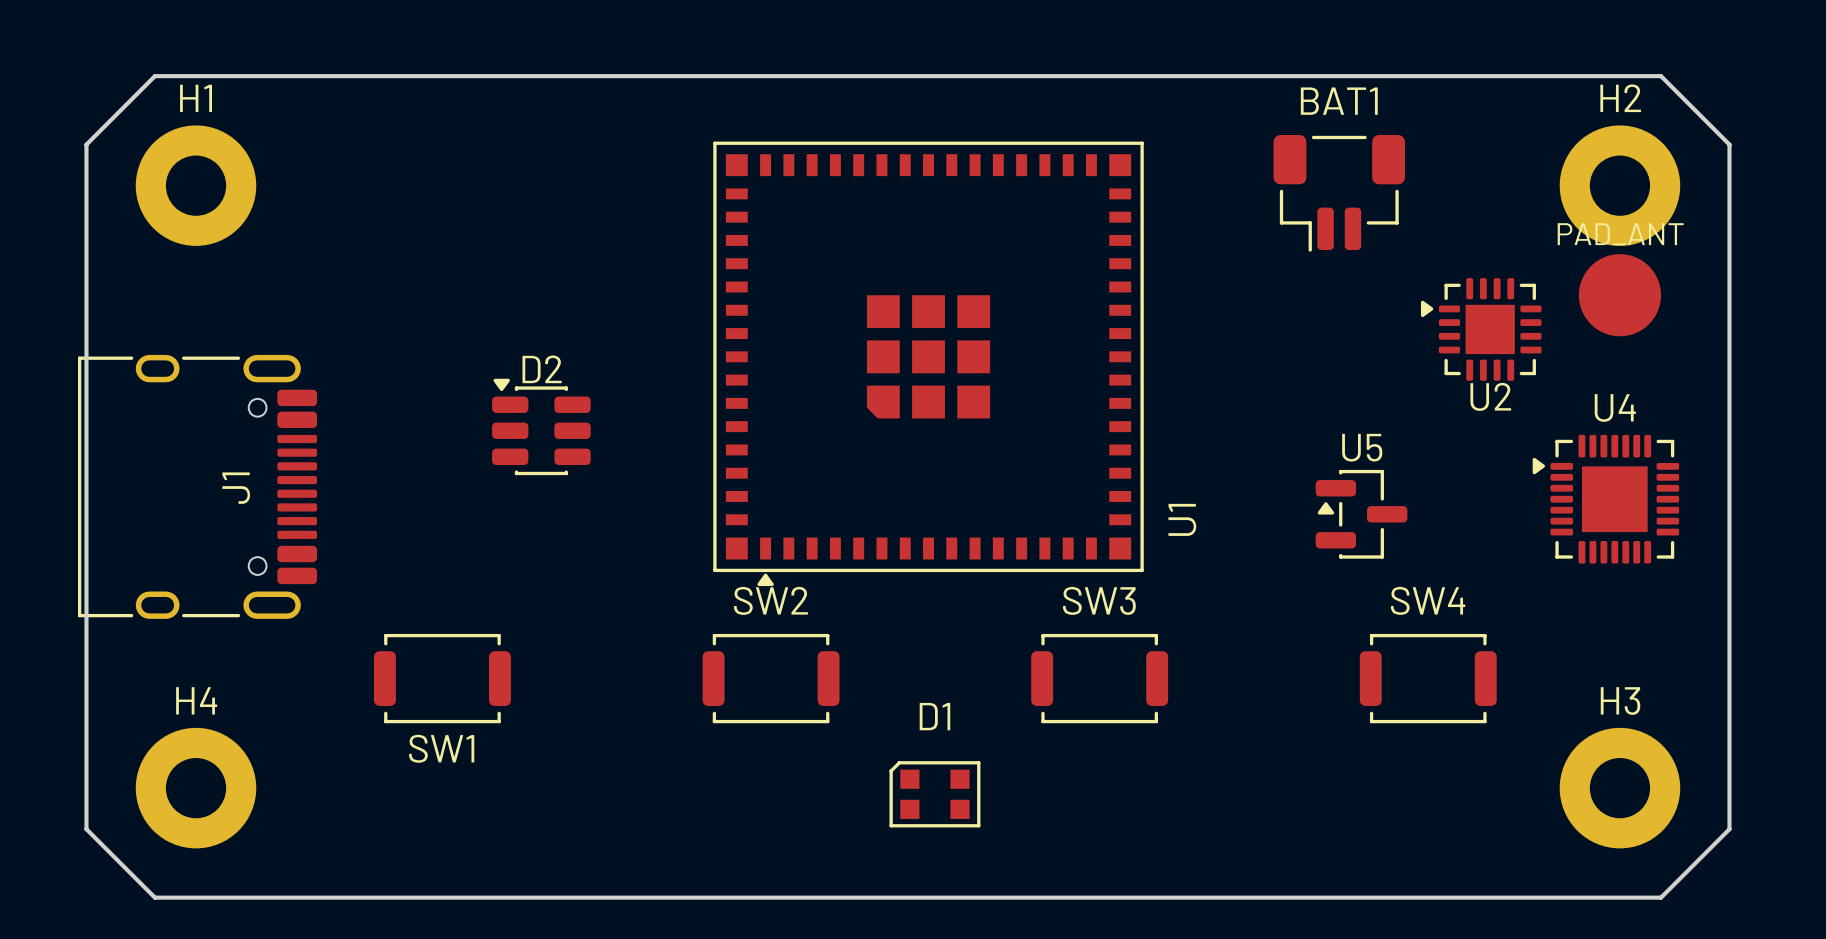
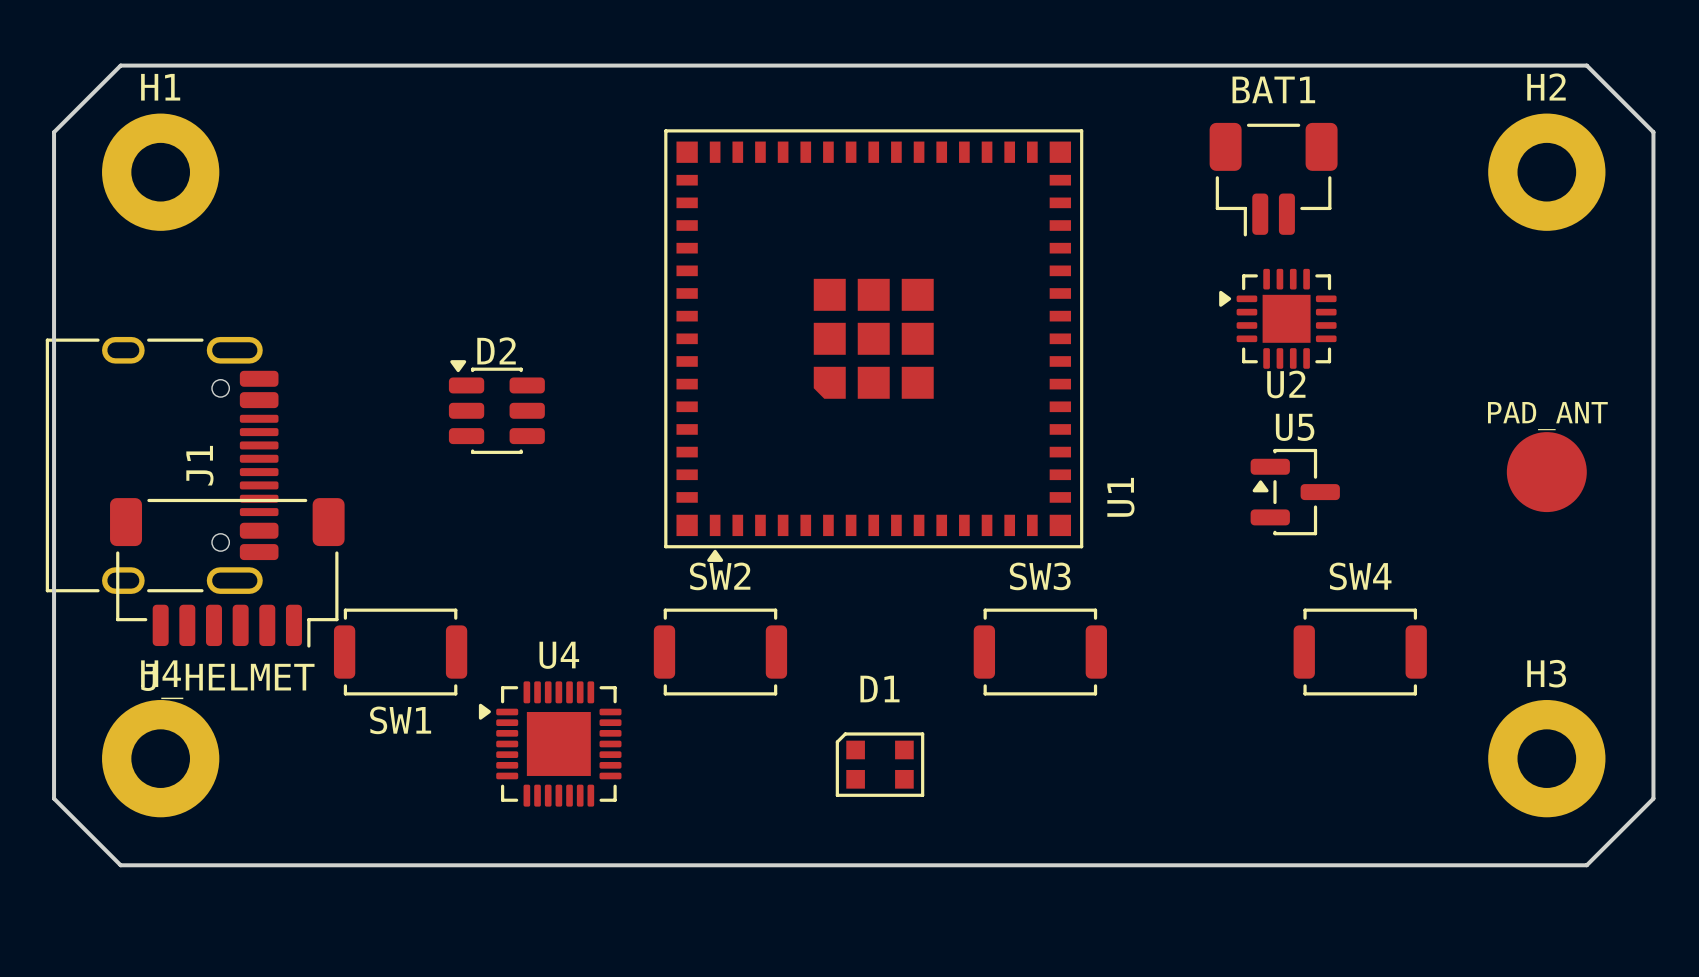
PAD_ANT position: (1619, 295) -> (1546, 472)
U2 position: (1481, 329) -> (1277, 318)
U4 position: (1605, 499) -> (550, 743)
J_HELMET: none -> (227, 572)

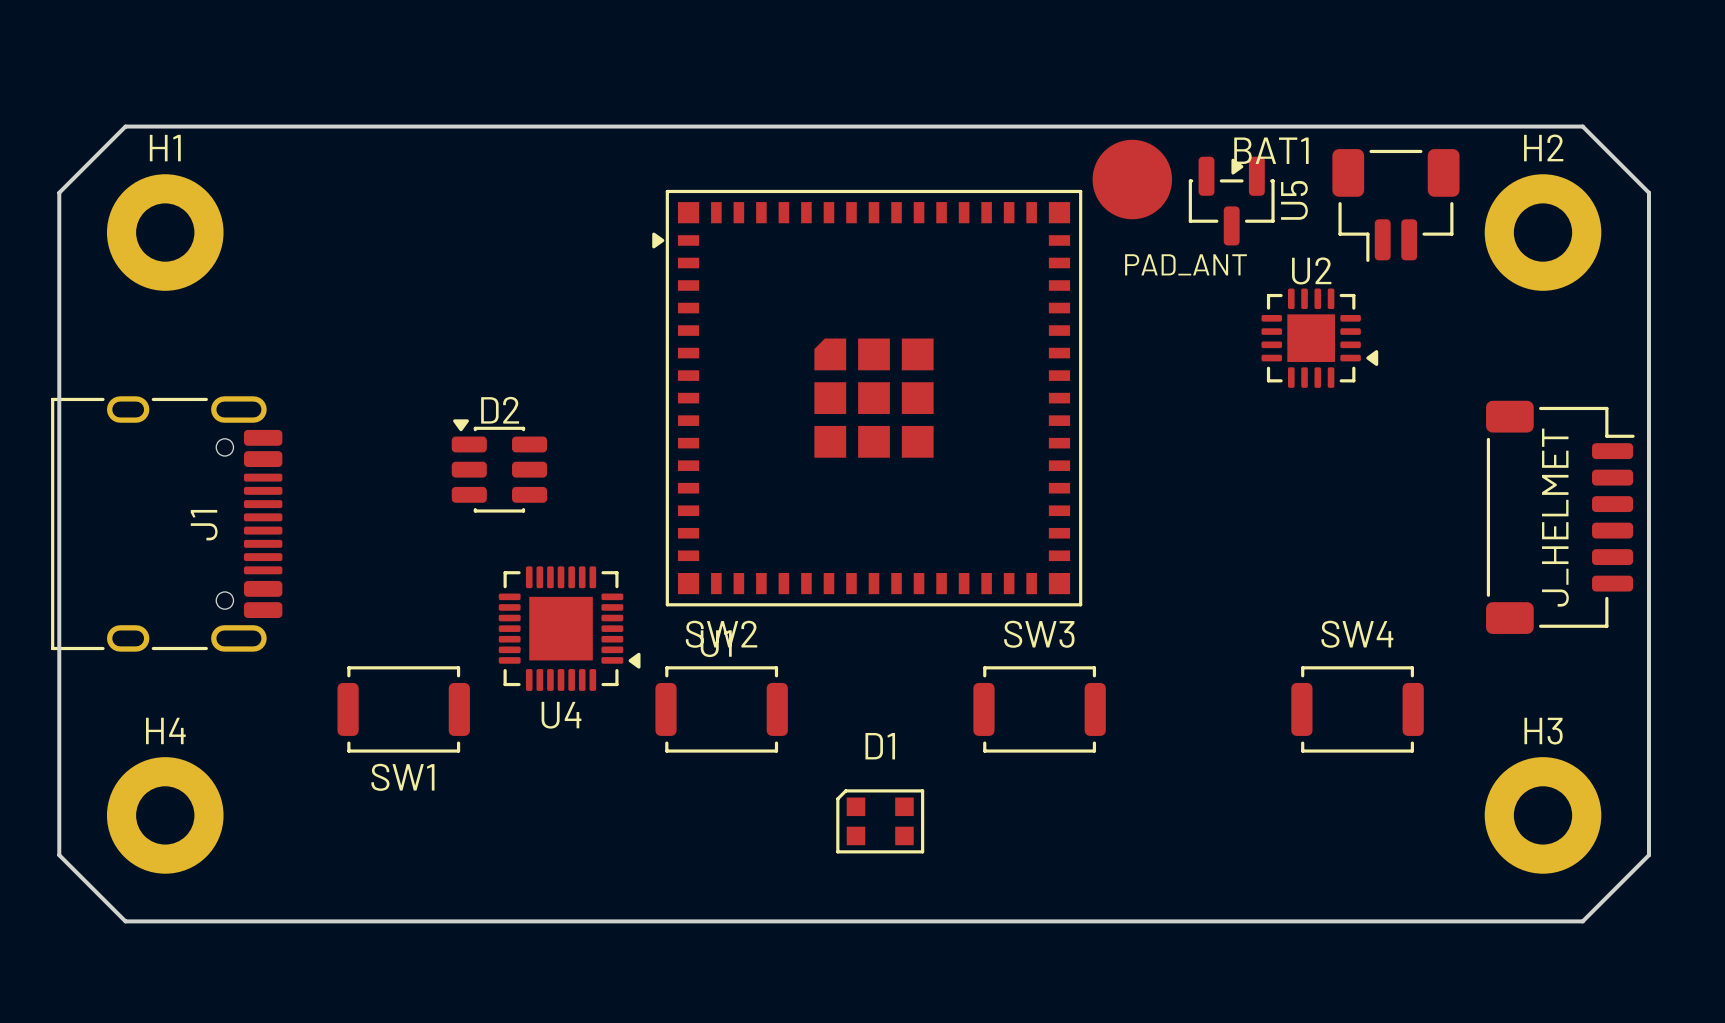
BAT1 position: (1273, 179) -> (1395, 205)
U2 rotation: 0° (1277, 318) -> 180° (1319, 338)
U1 rotation: 0° (873, 345) -> 90° clockwise (867, 398)
PAD_ANT name position: PAD_ANT (1547, 416) -> PAD_ANT (1185, 264)
J_HELMET: none -> (1560, 517)
PAD_ANT position: (1546, 472) -> (1132, 179)
U5 rotation: 0° (1295, 492) -> 90° clockwise (1231, 201)
U5 position: (1295, 492) -> (1231, 201)
J_HELMET: (227, 572) -> none
U4 rotation: 0° (550, 743) -> 180° (569, 628)
U4 position: (550, 743) -> (569, 628)

